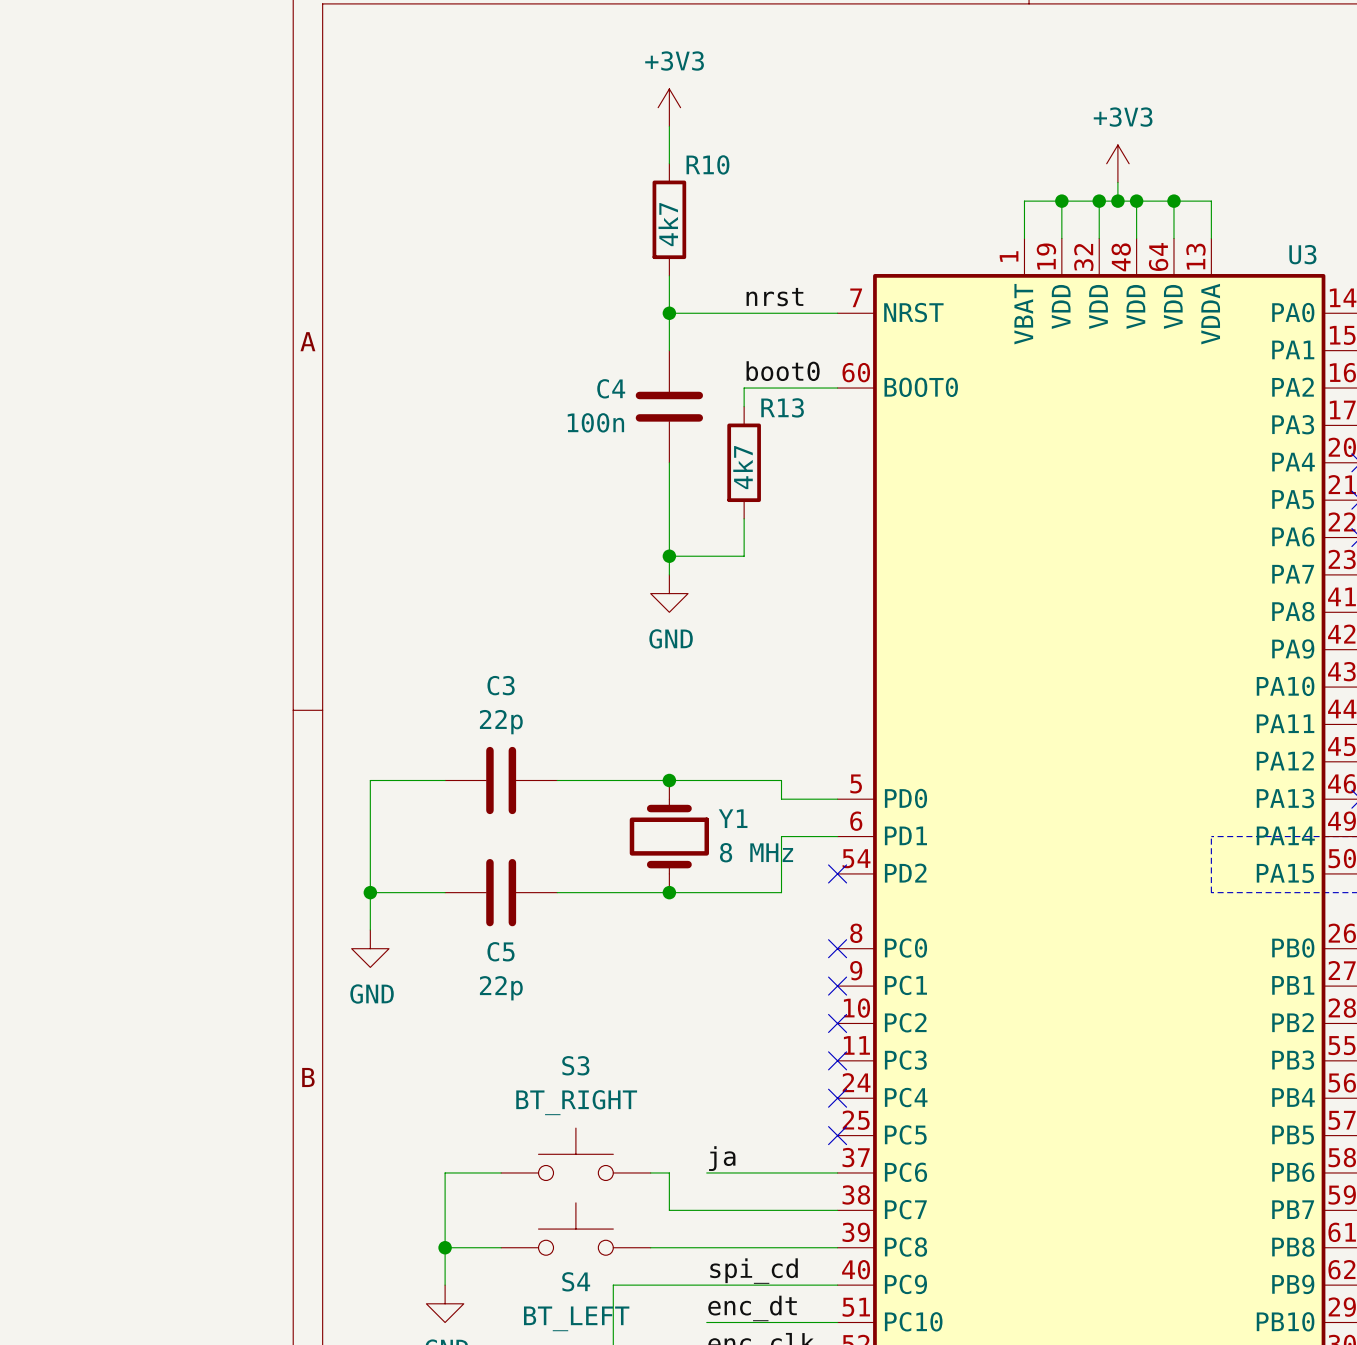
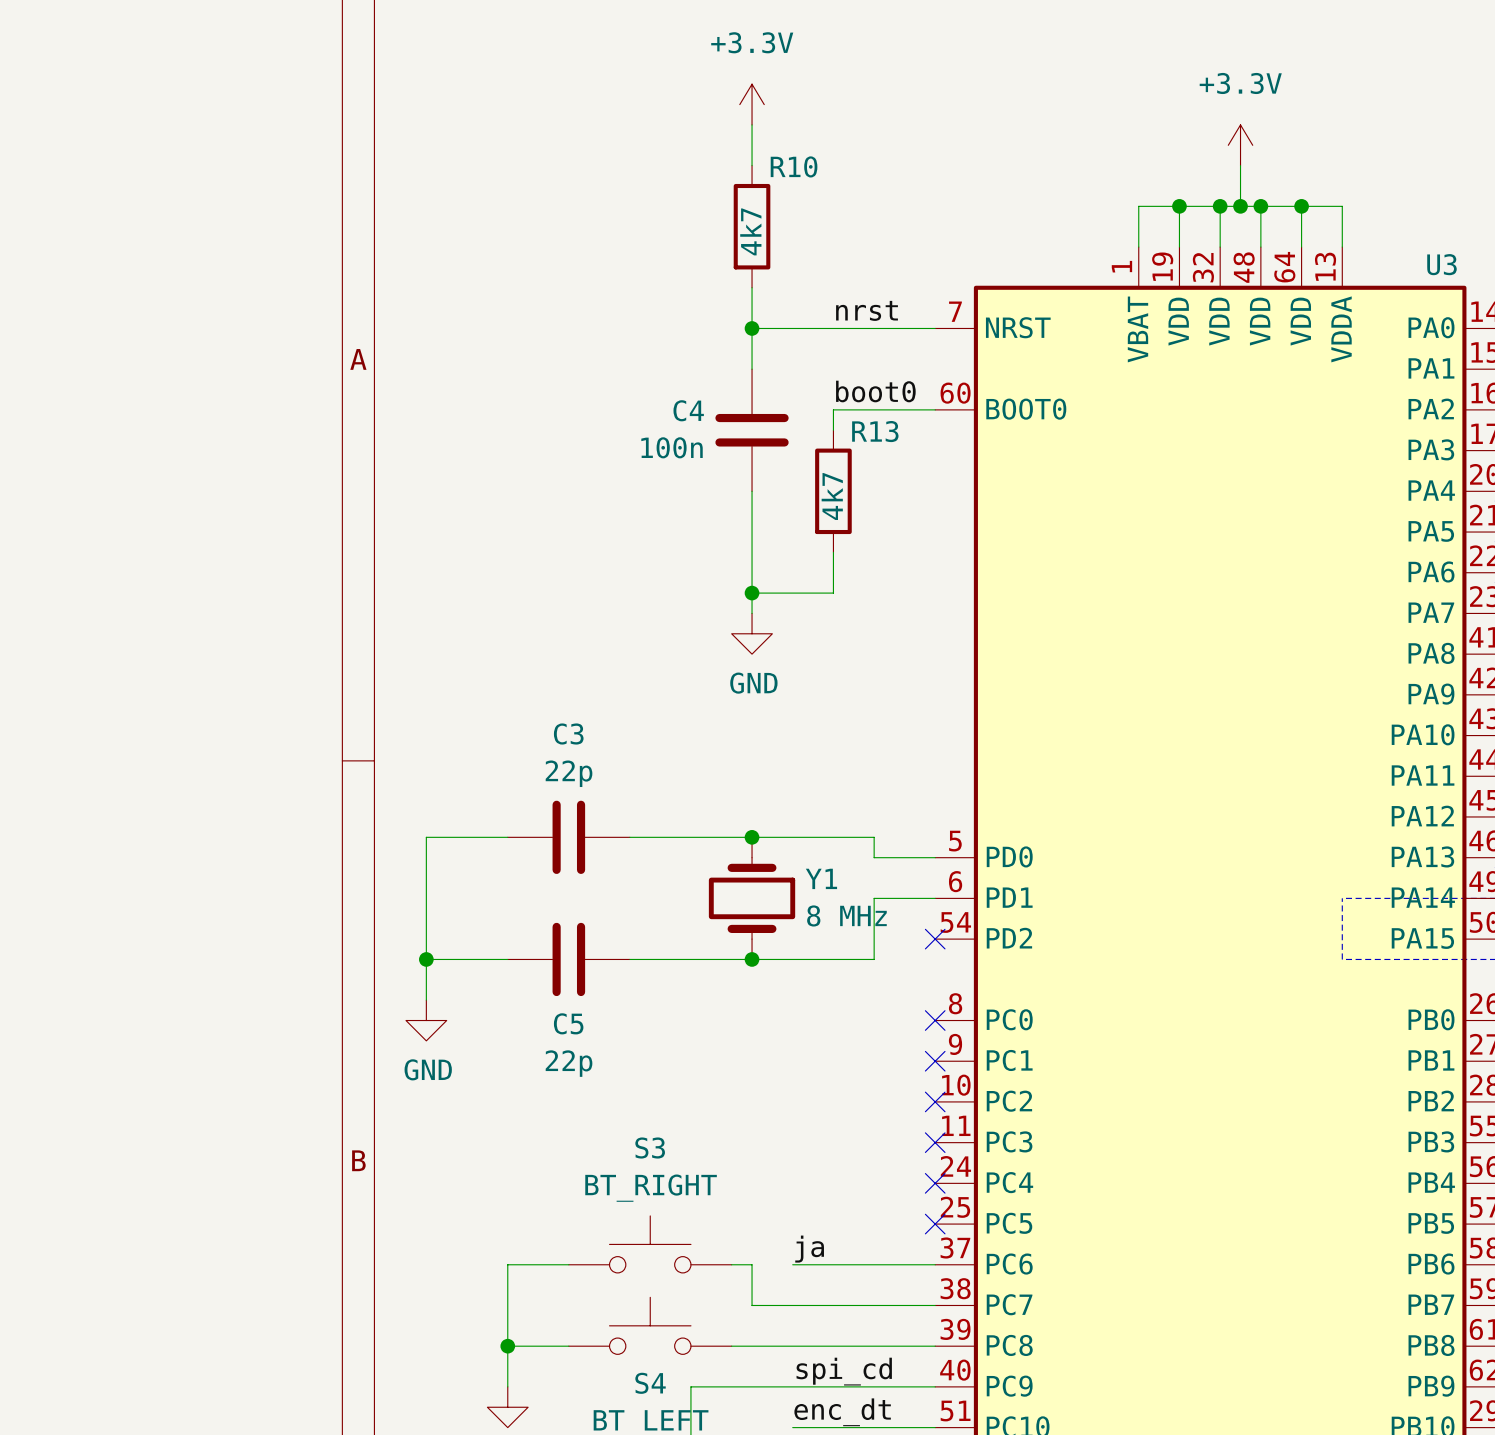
power symbol: +3V3 (669, 107) -> +3.3V (752, 104)
power symbol: none -> +3.3V (1240, 145)
power symbol: +3V3 (1117, 163) -> none

